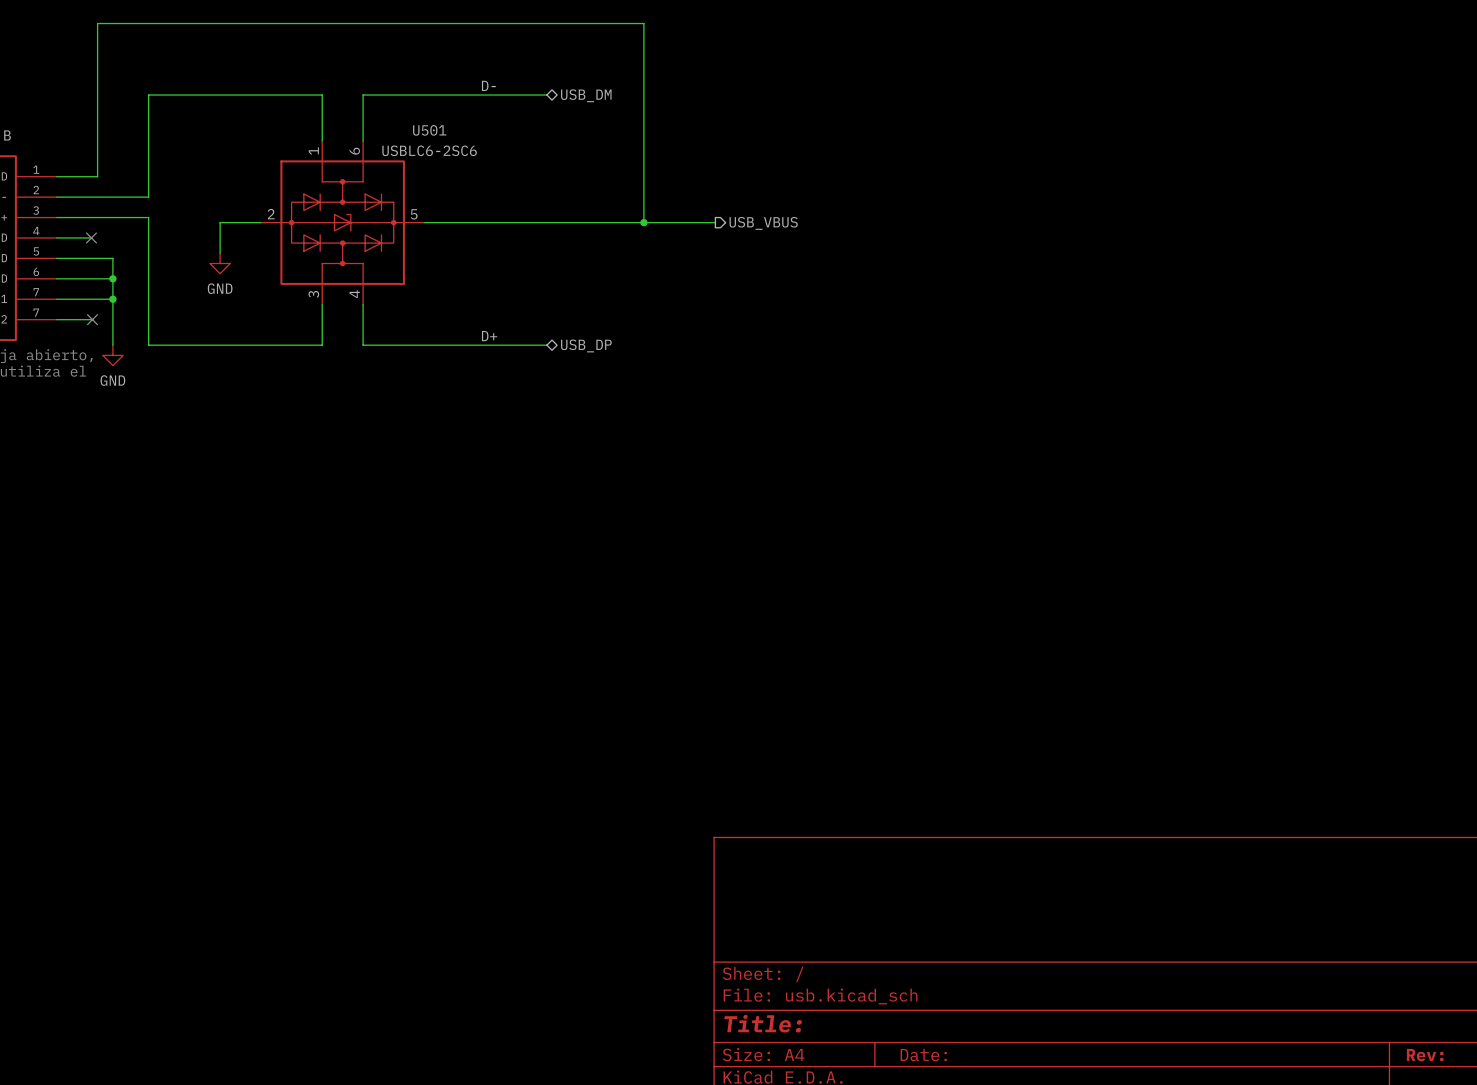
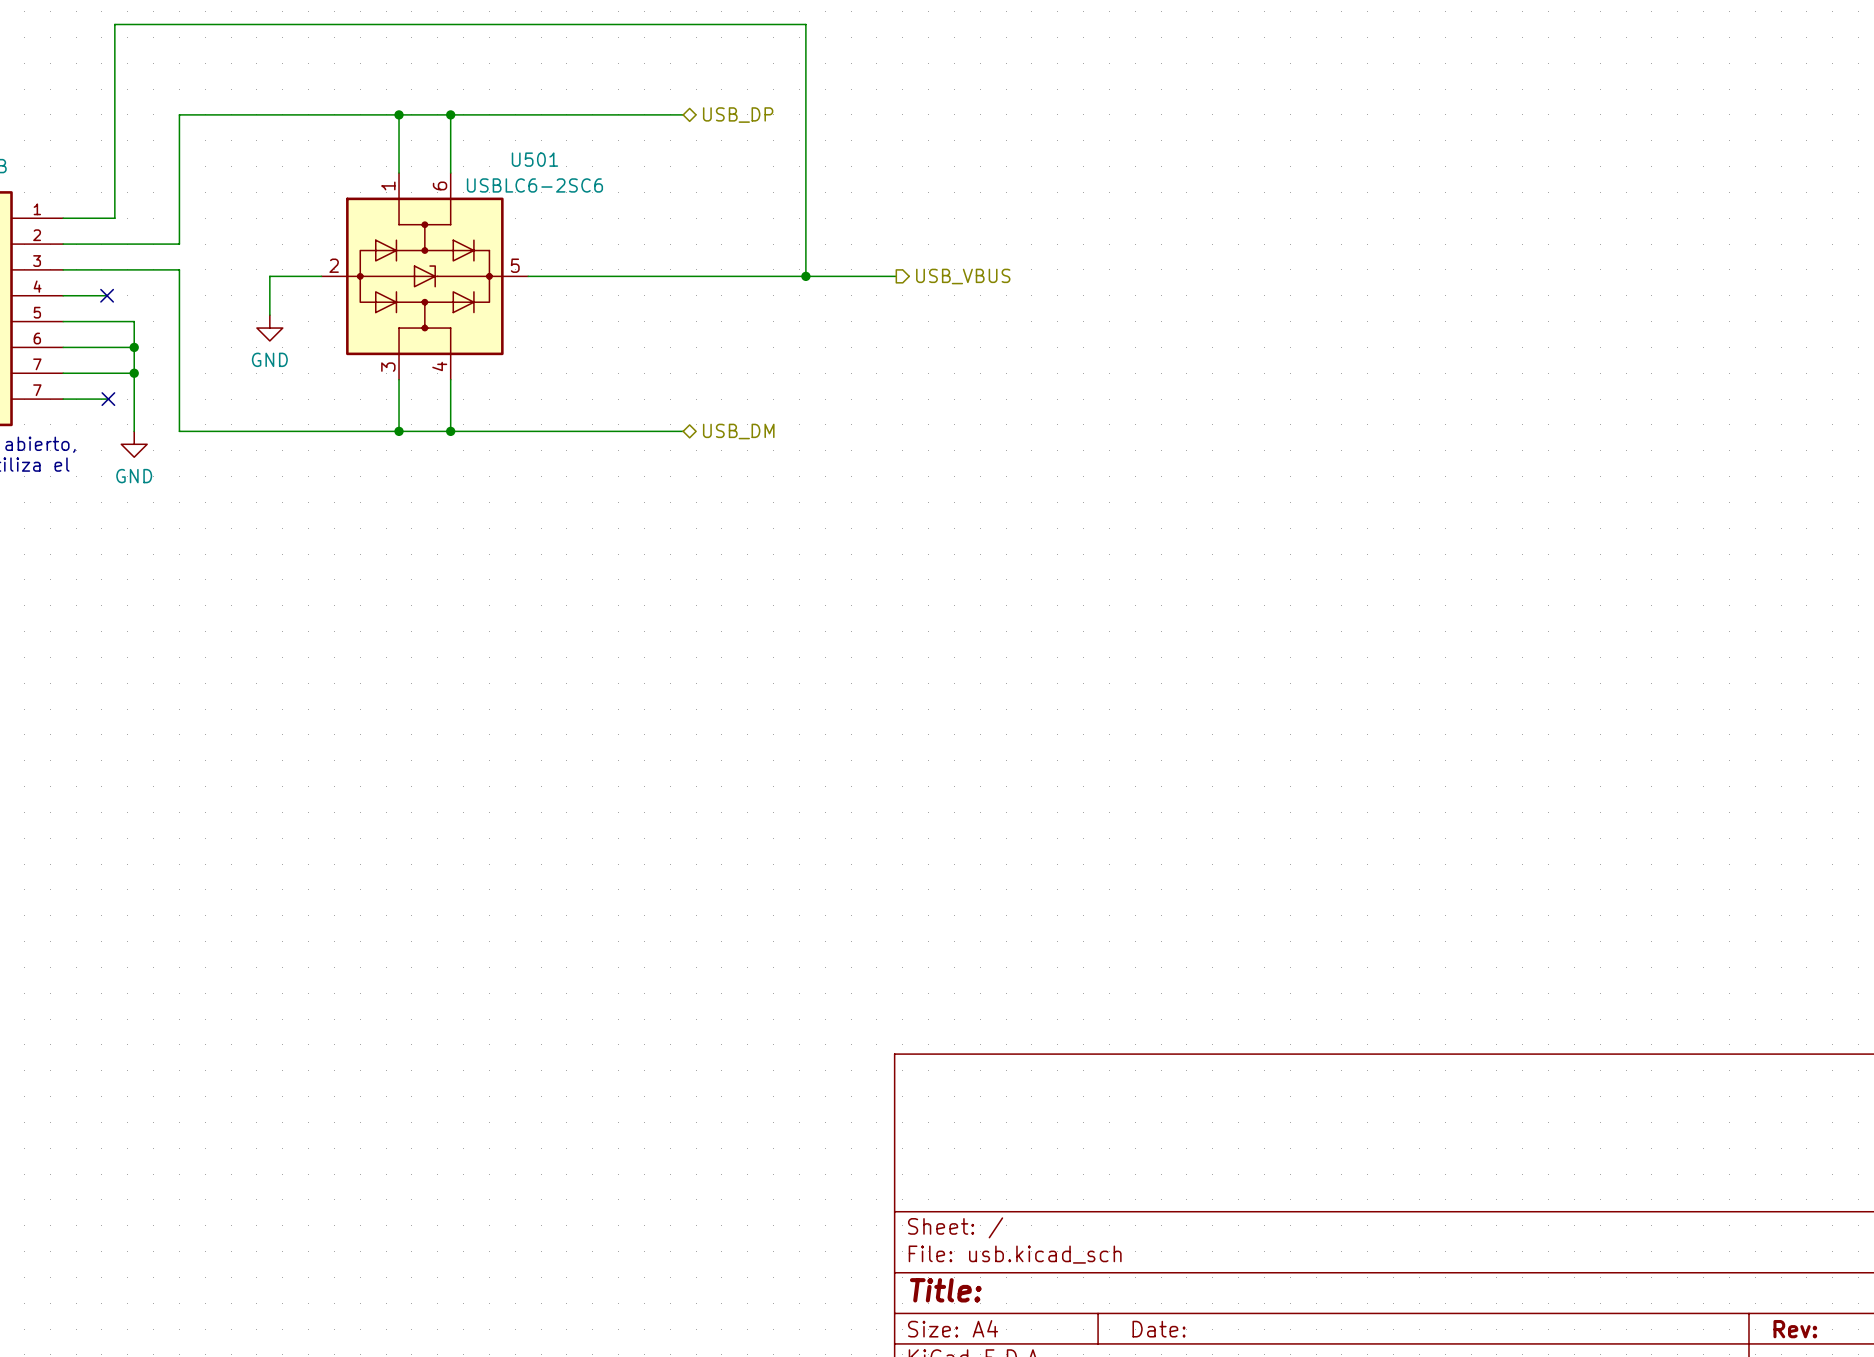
label: D- (488, 85) -> none
wire: none -> (399, 114) (450, 114)
junction: none -> (399, 114)
junction: none -> (450, 114)
hierarchical label: USB_DM (586, 95) -> USB_DP (738, 115)
label: D+ (489, 336) -> none
wire: none -> (399, 431) (450, 431)
junction: none -> (399, 431)
junction: none -> (450, 431)
hierarchical label: USB_DP (586, 345) -> USB_DM (738, 431)

